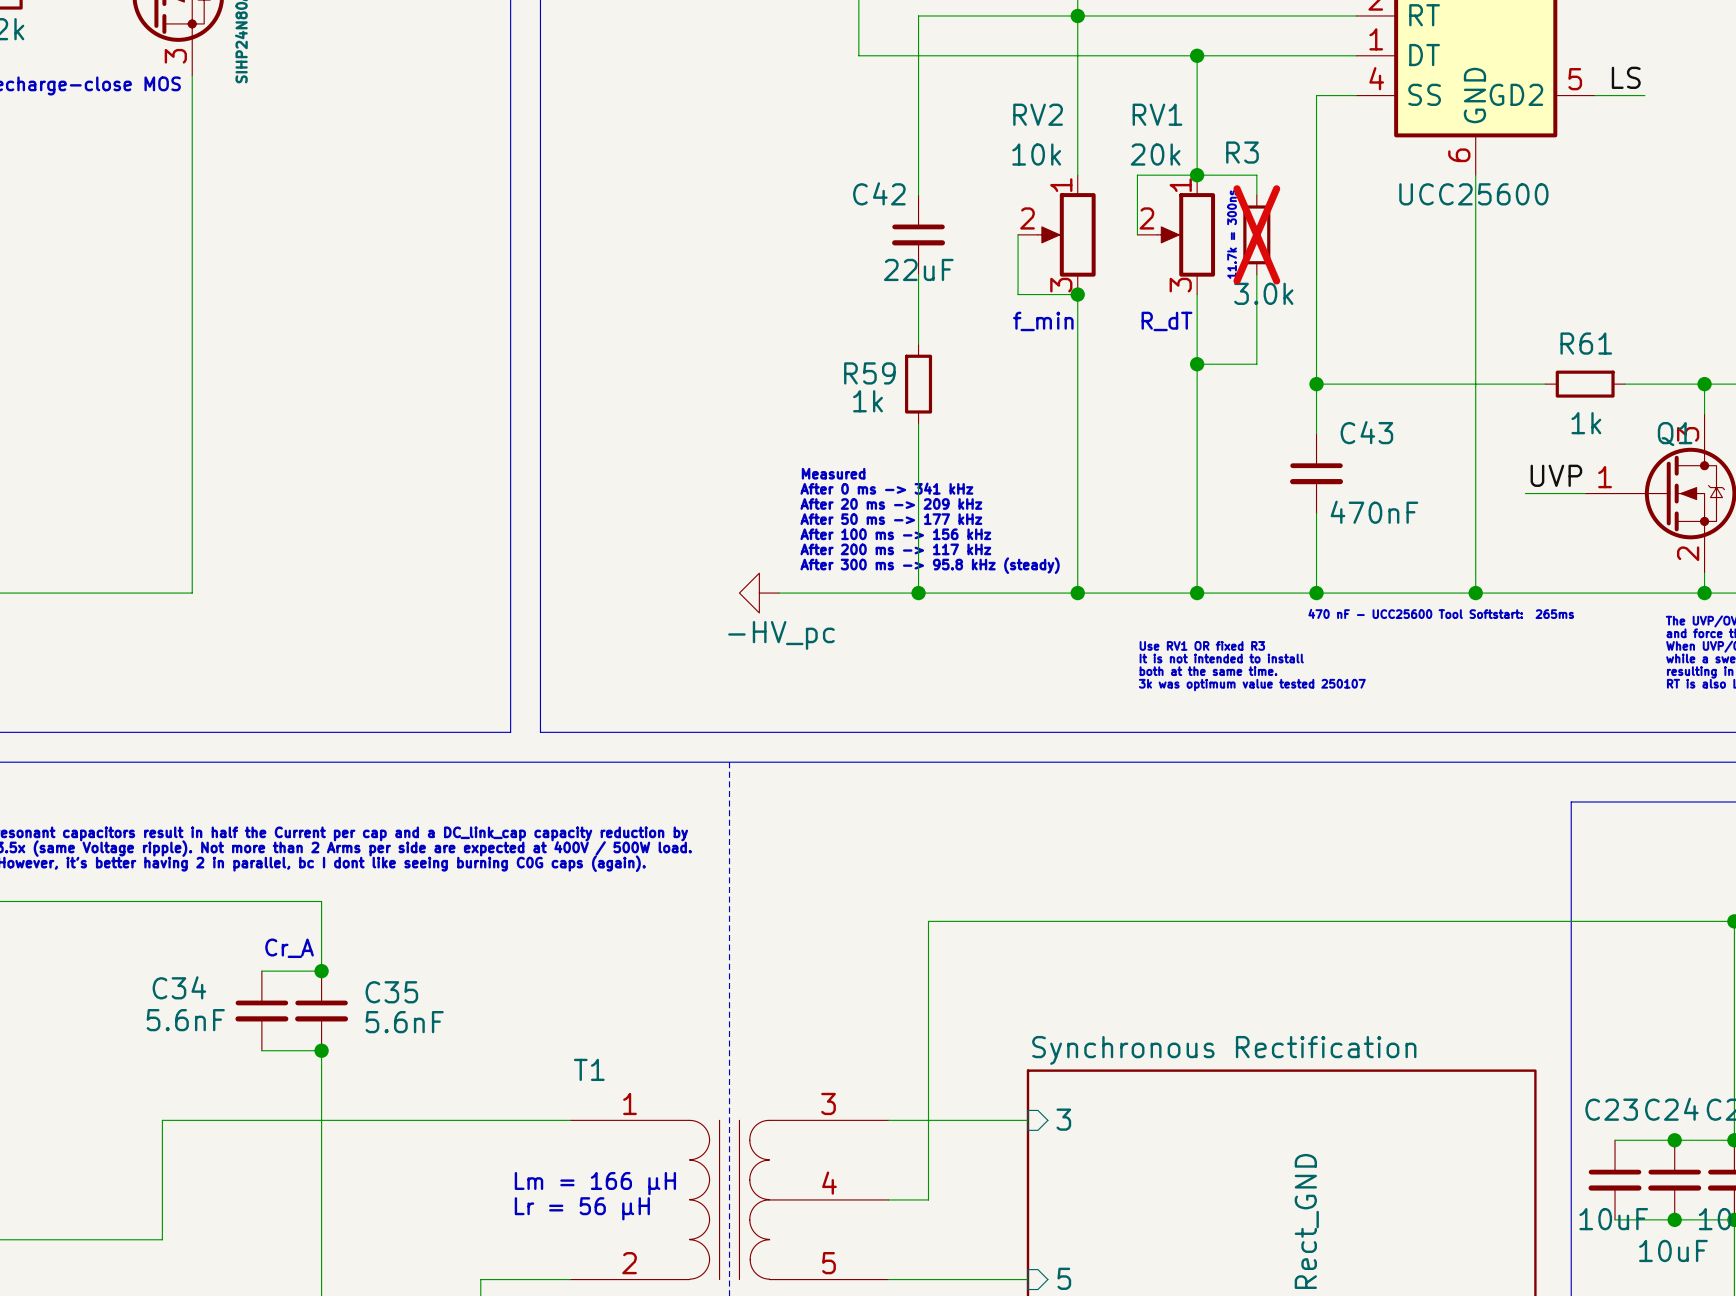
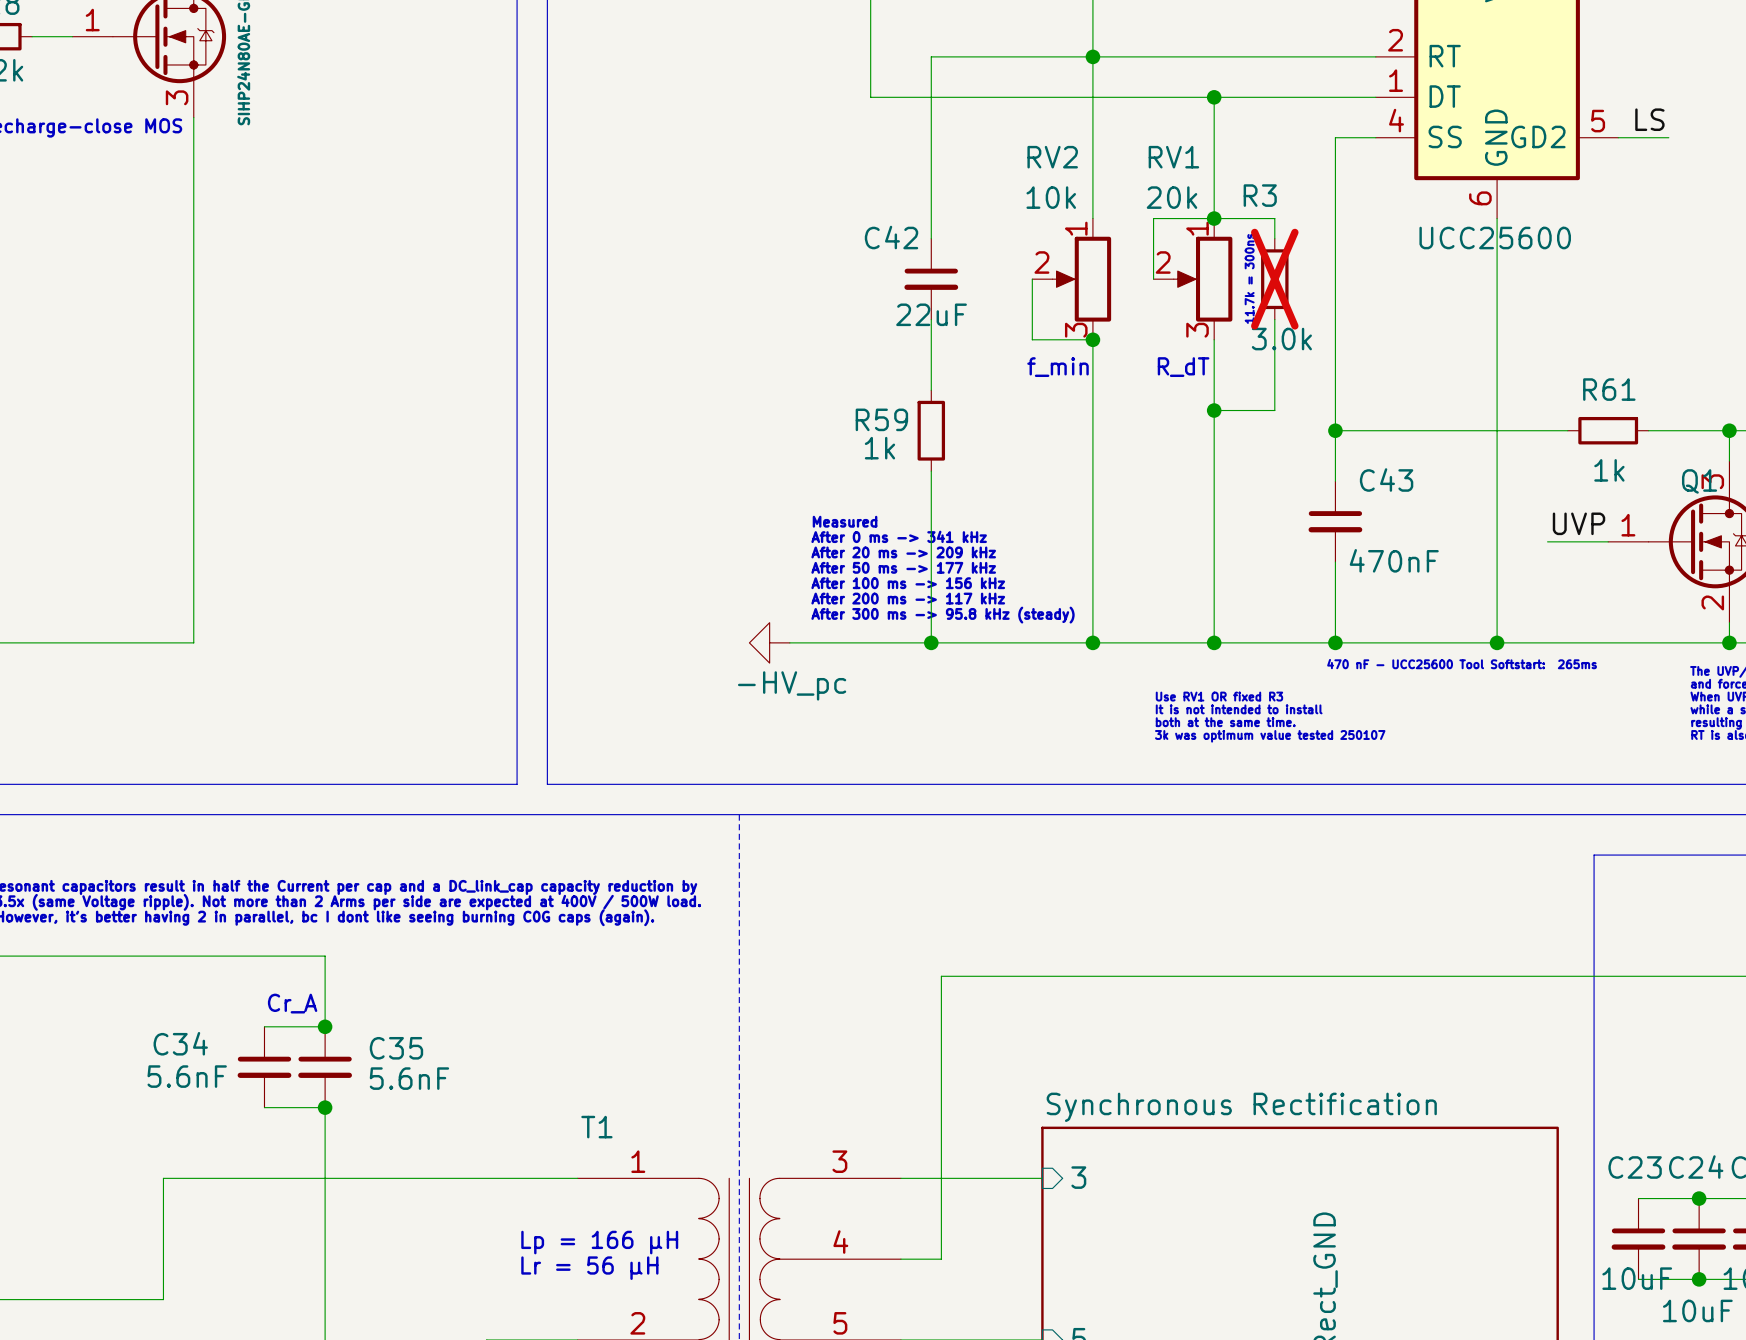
text: Lm = 166 µH (595, 1183) -> Lp = 166 µH (599, 1242)

